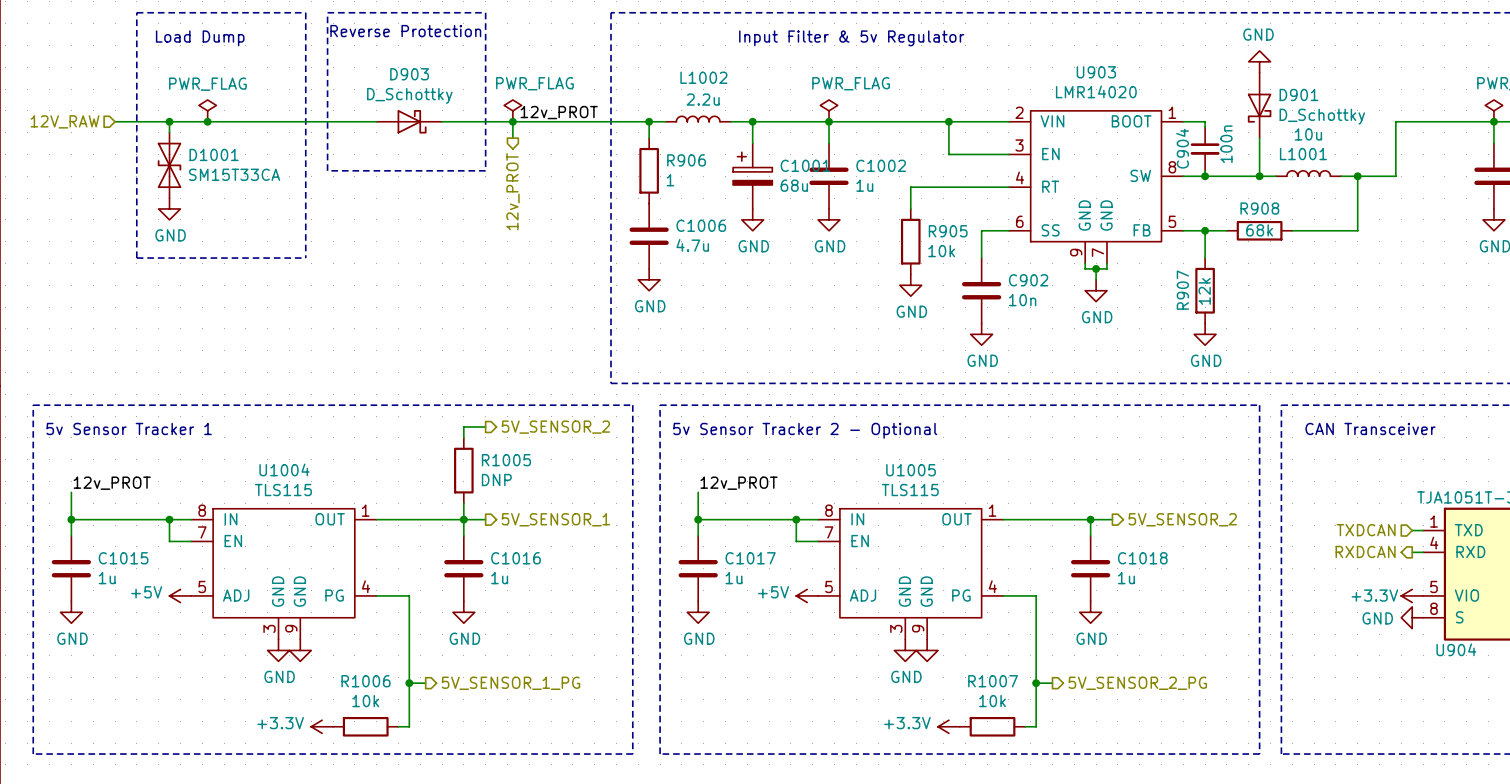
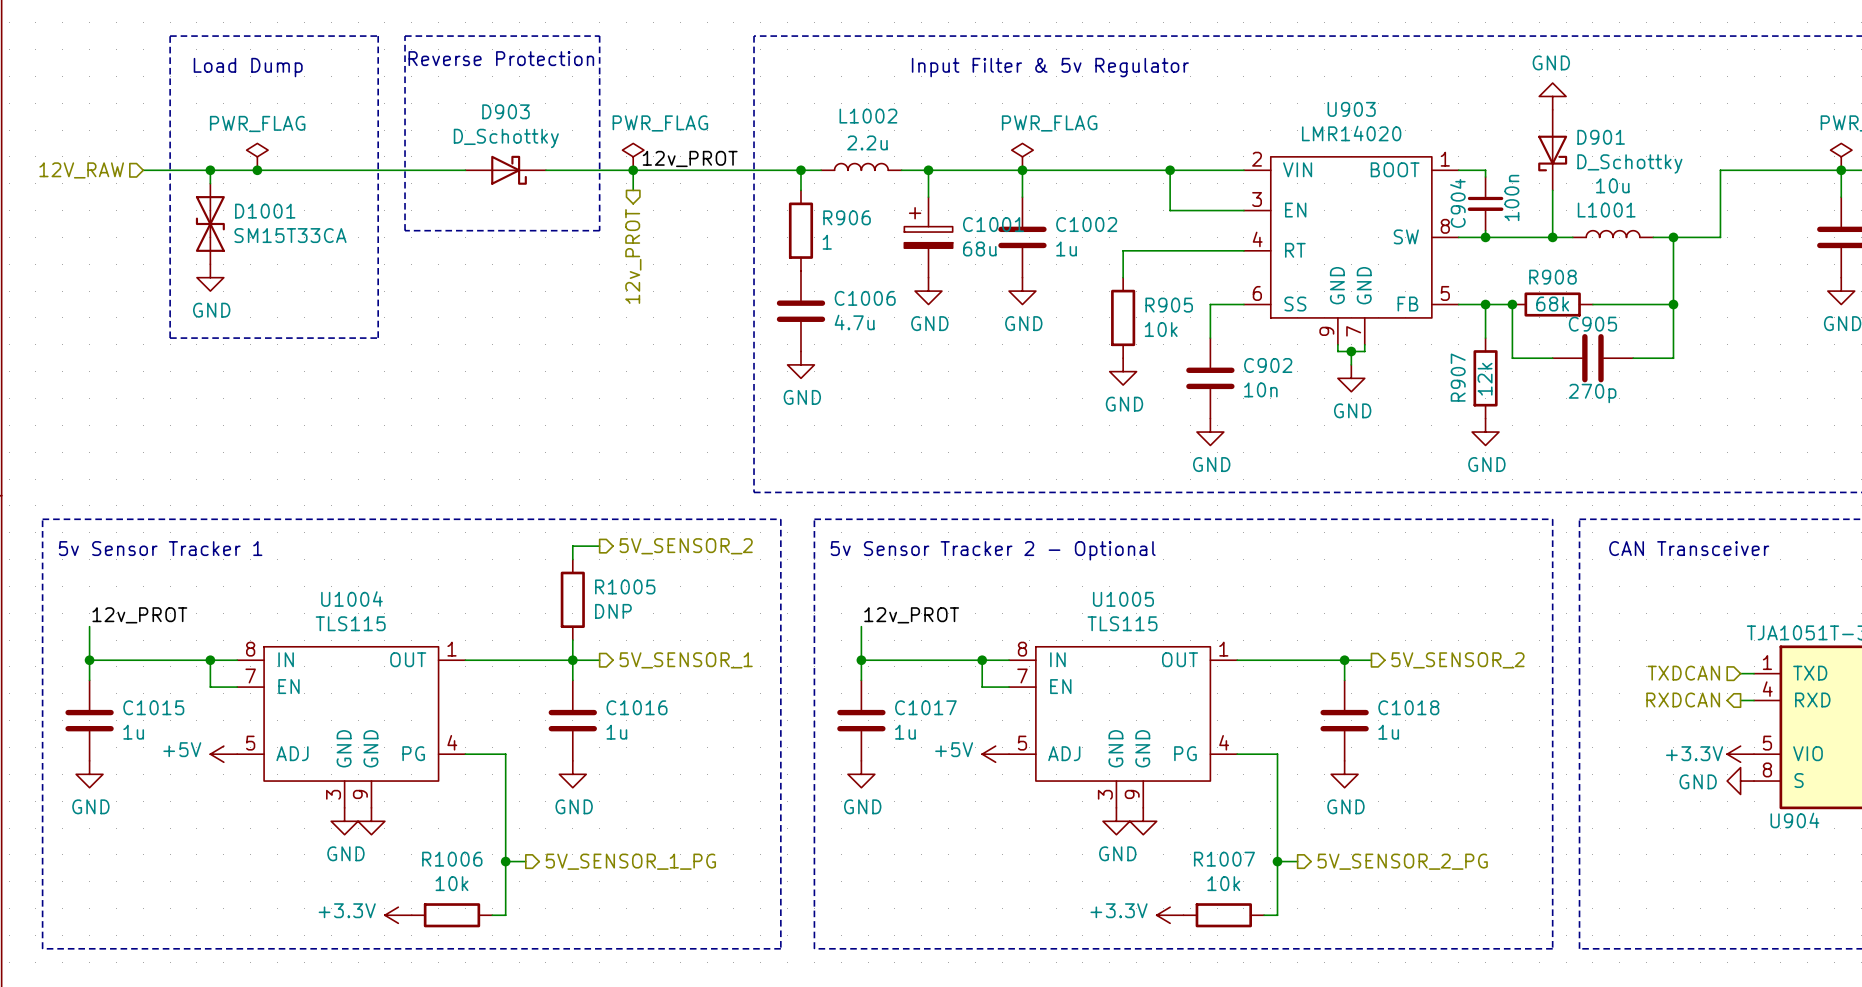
wire: none -> (1512, 304) (1512, 358) (1552, 358)
junction: none -> (1512, 304)
wire: none -> (1673, 304) (1673, 358) (1633, 358)
junction: none -> (1673, 304)
C905: none -> 270p (1592, 358)

